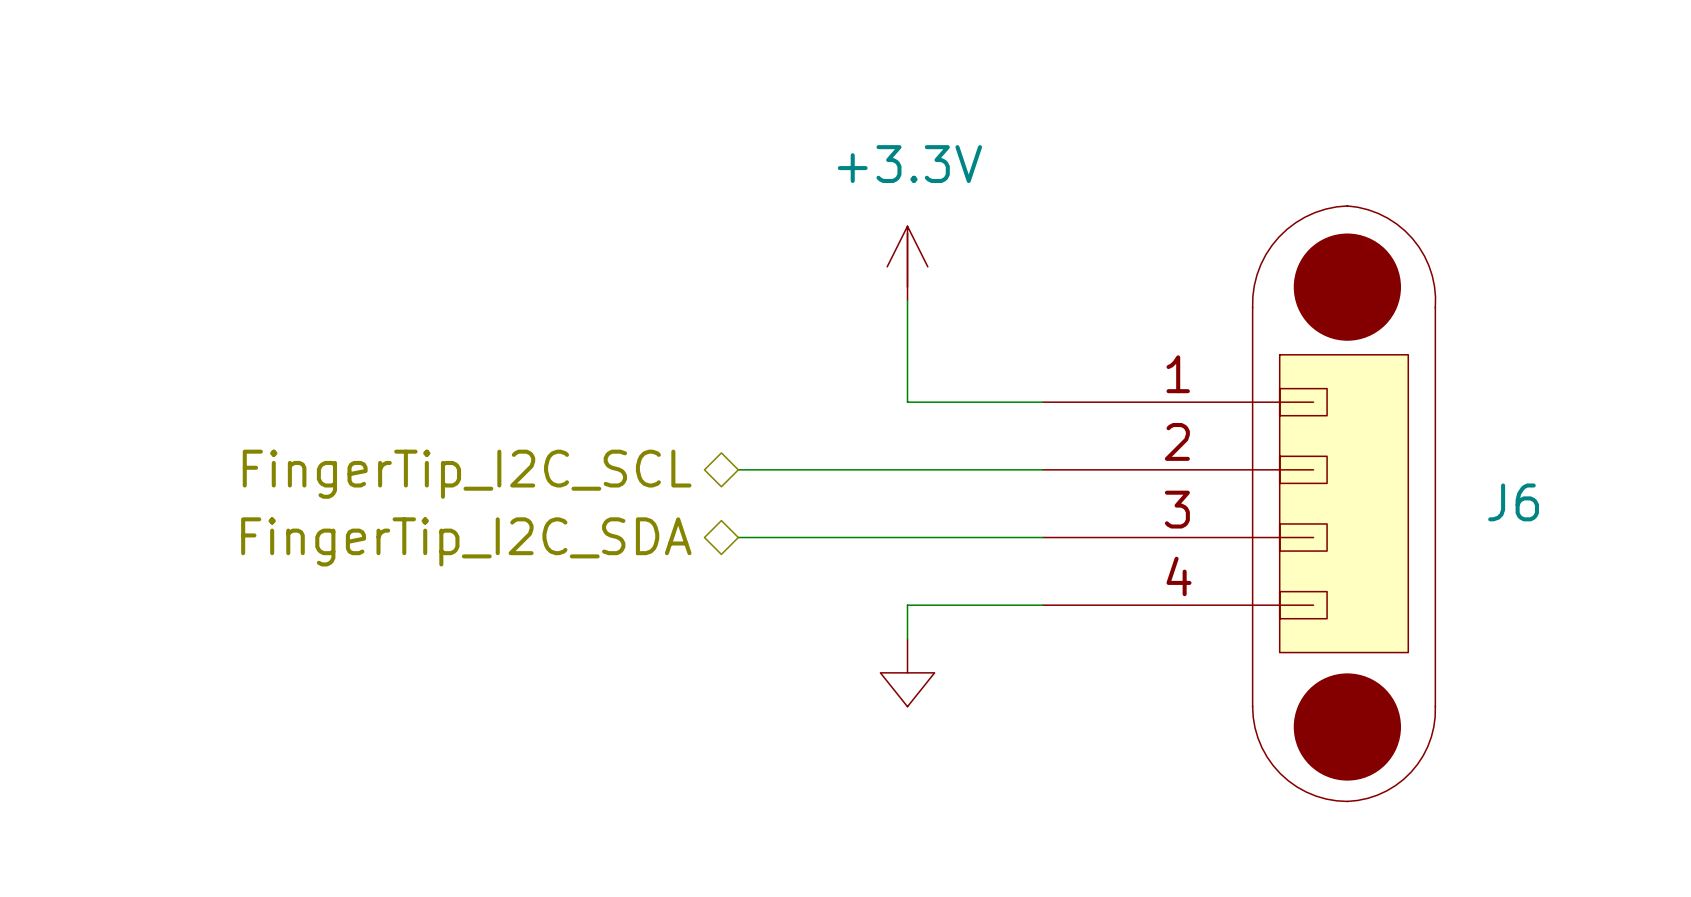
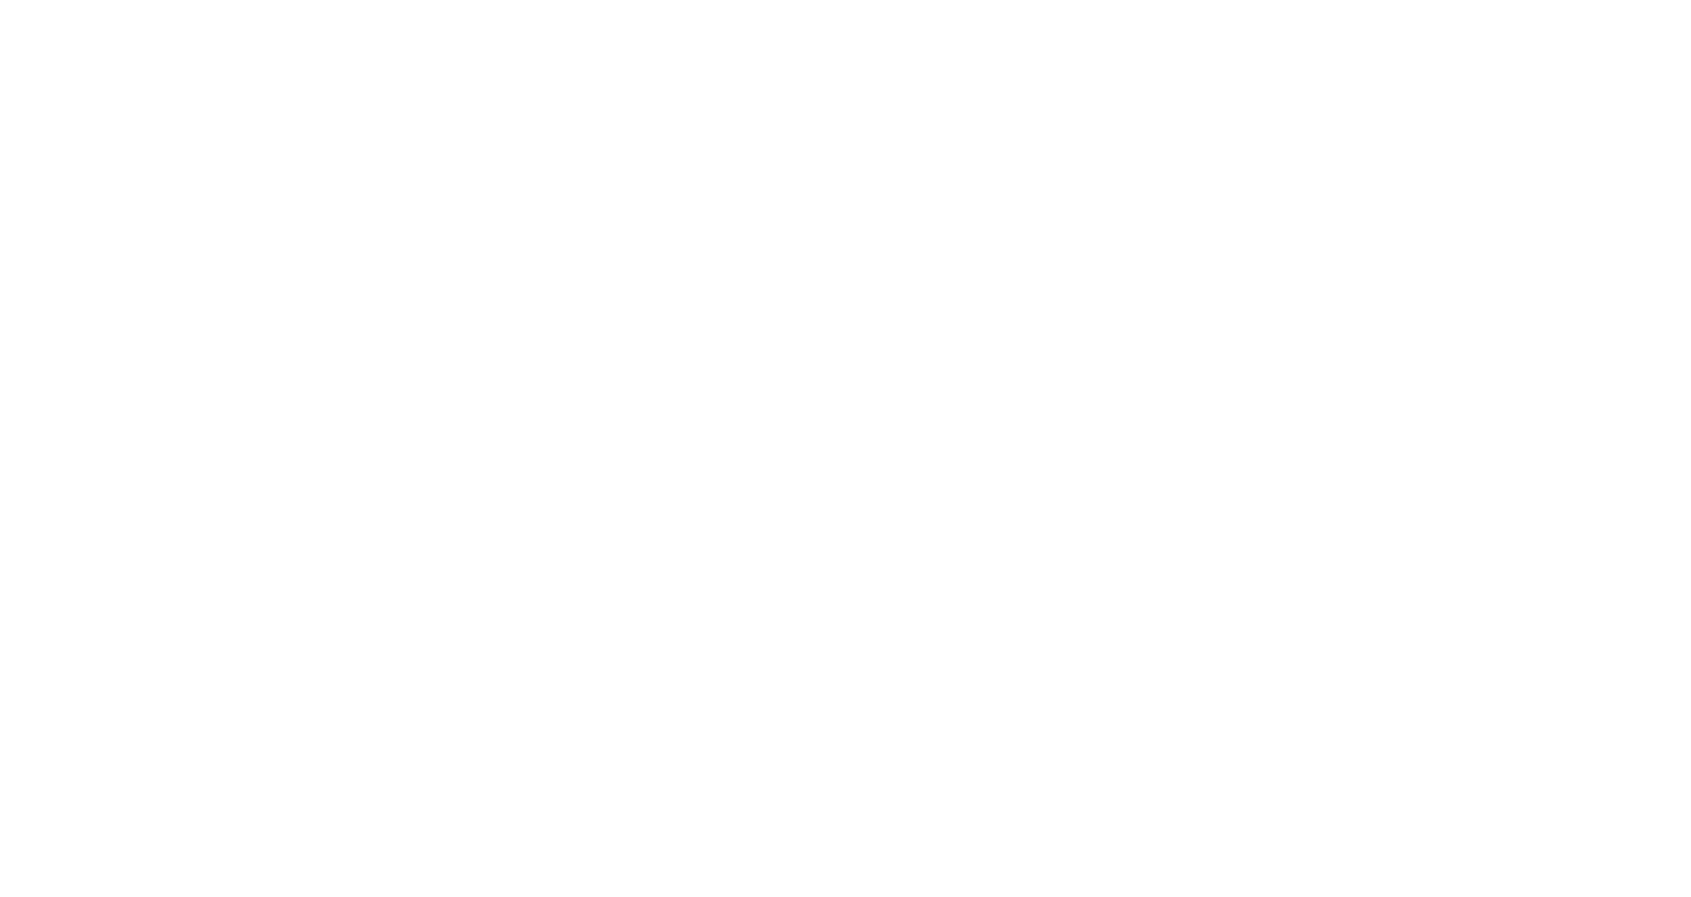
power symbol: +3.3V (907, 263) -> none
wire: (907, 300) (907, 402) (1042, 402) -> none
wire: (738, 469) (1042, 469) -> none
hierarchical label: FingerTip_I2C_SCL (467, 474) -> none
J6: (1239, 503) -> none
wire: (738, 537) (1042, 537) -> none
hierarchical label: FingerTip_I2C_SDA (466, 541) -> none
wire: (1042, 605) (907, 605) (907, 639) -> none
power symbol: (907, 672) -> none

